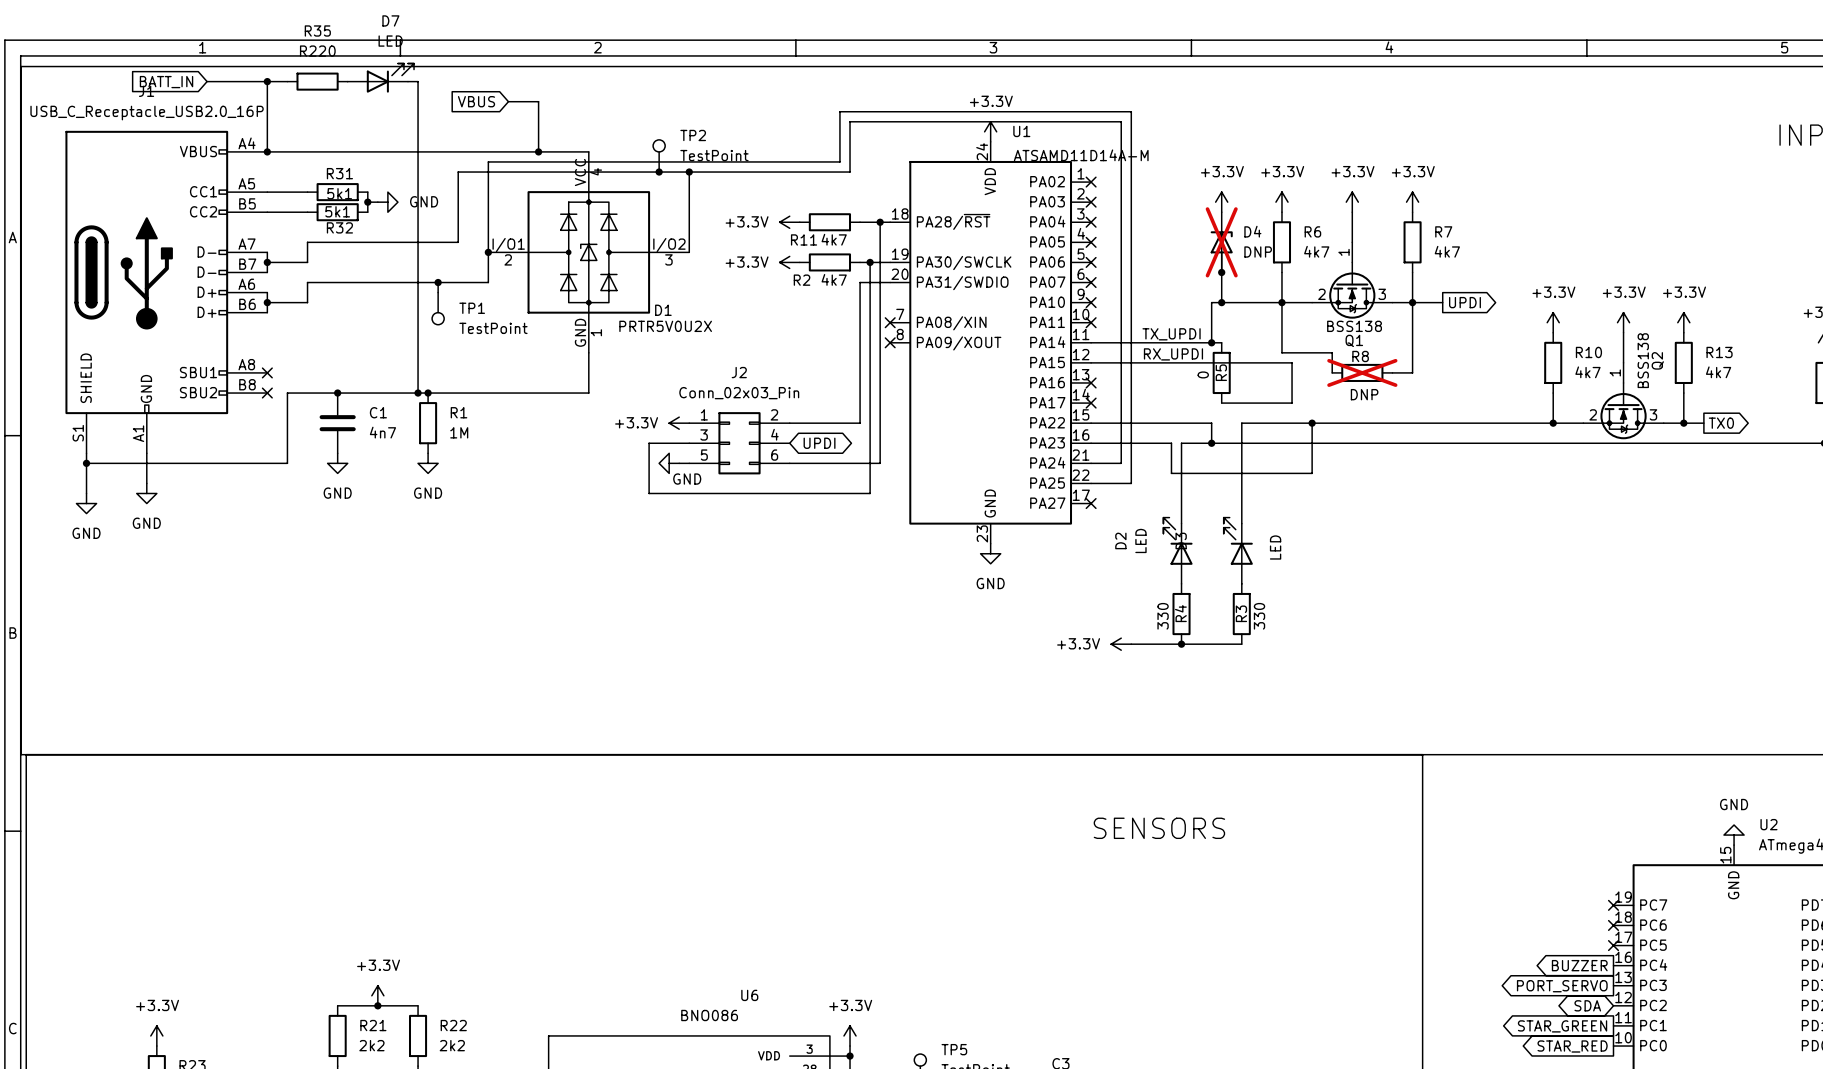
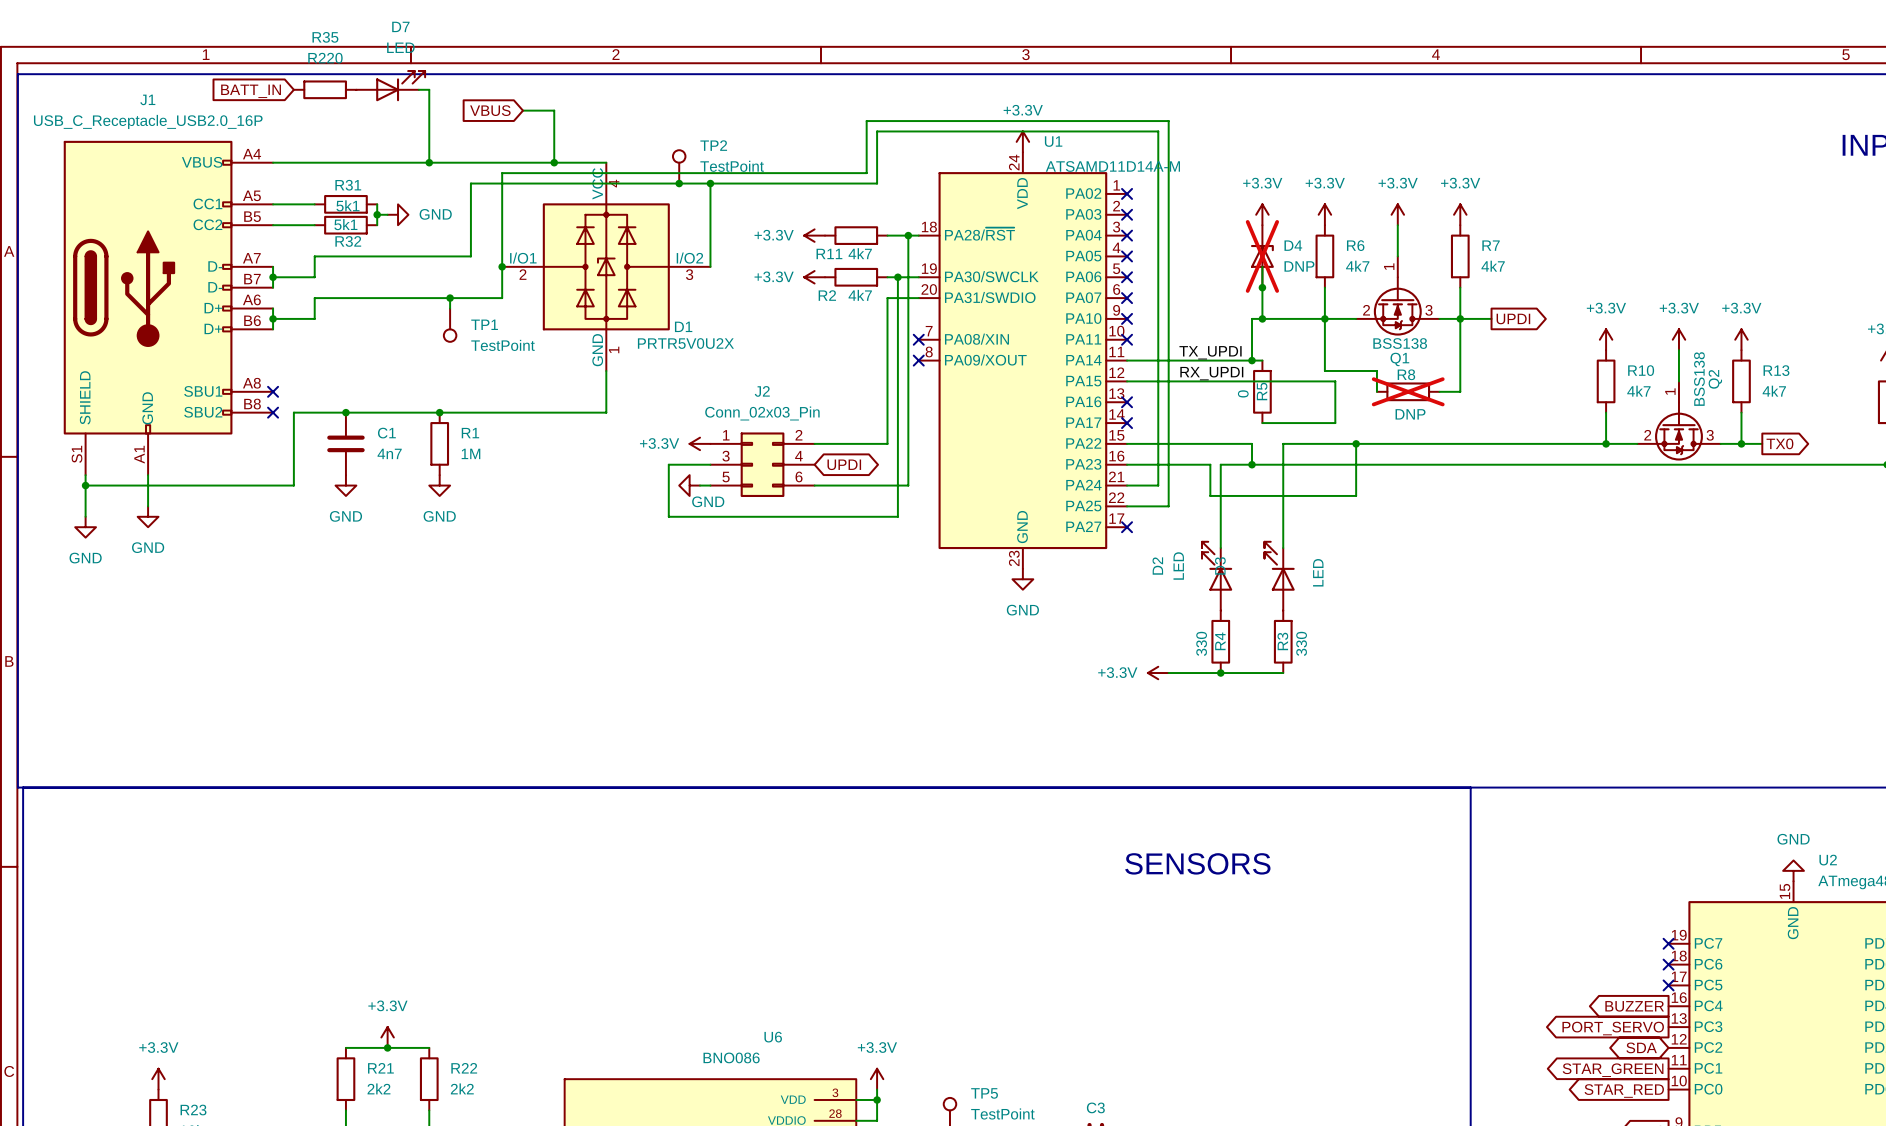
wire: (207, 81) (287, 81) -> none
wire: (267, 81) (267, 151) -> none
junction: (267, 81) -> none
global label position: BATT_IN (166, 82) -> BATT_IN (251, 91)
junction: (267, 151) -> none
wire: (418, 151) (418, 393) -> none
junction: none -> (429, 162)
junction: (418, 393) -> none

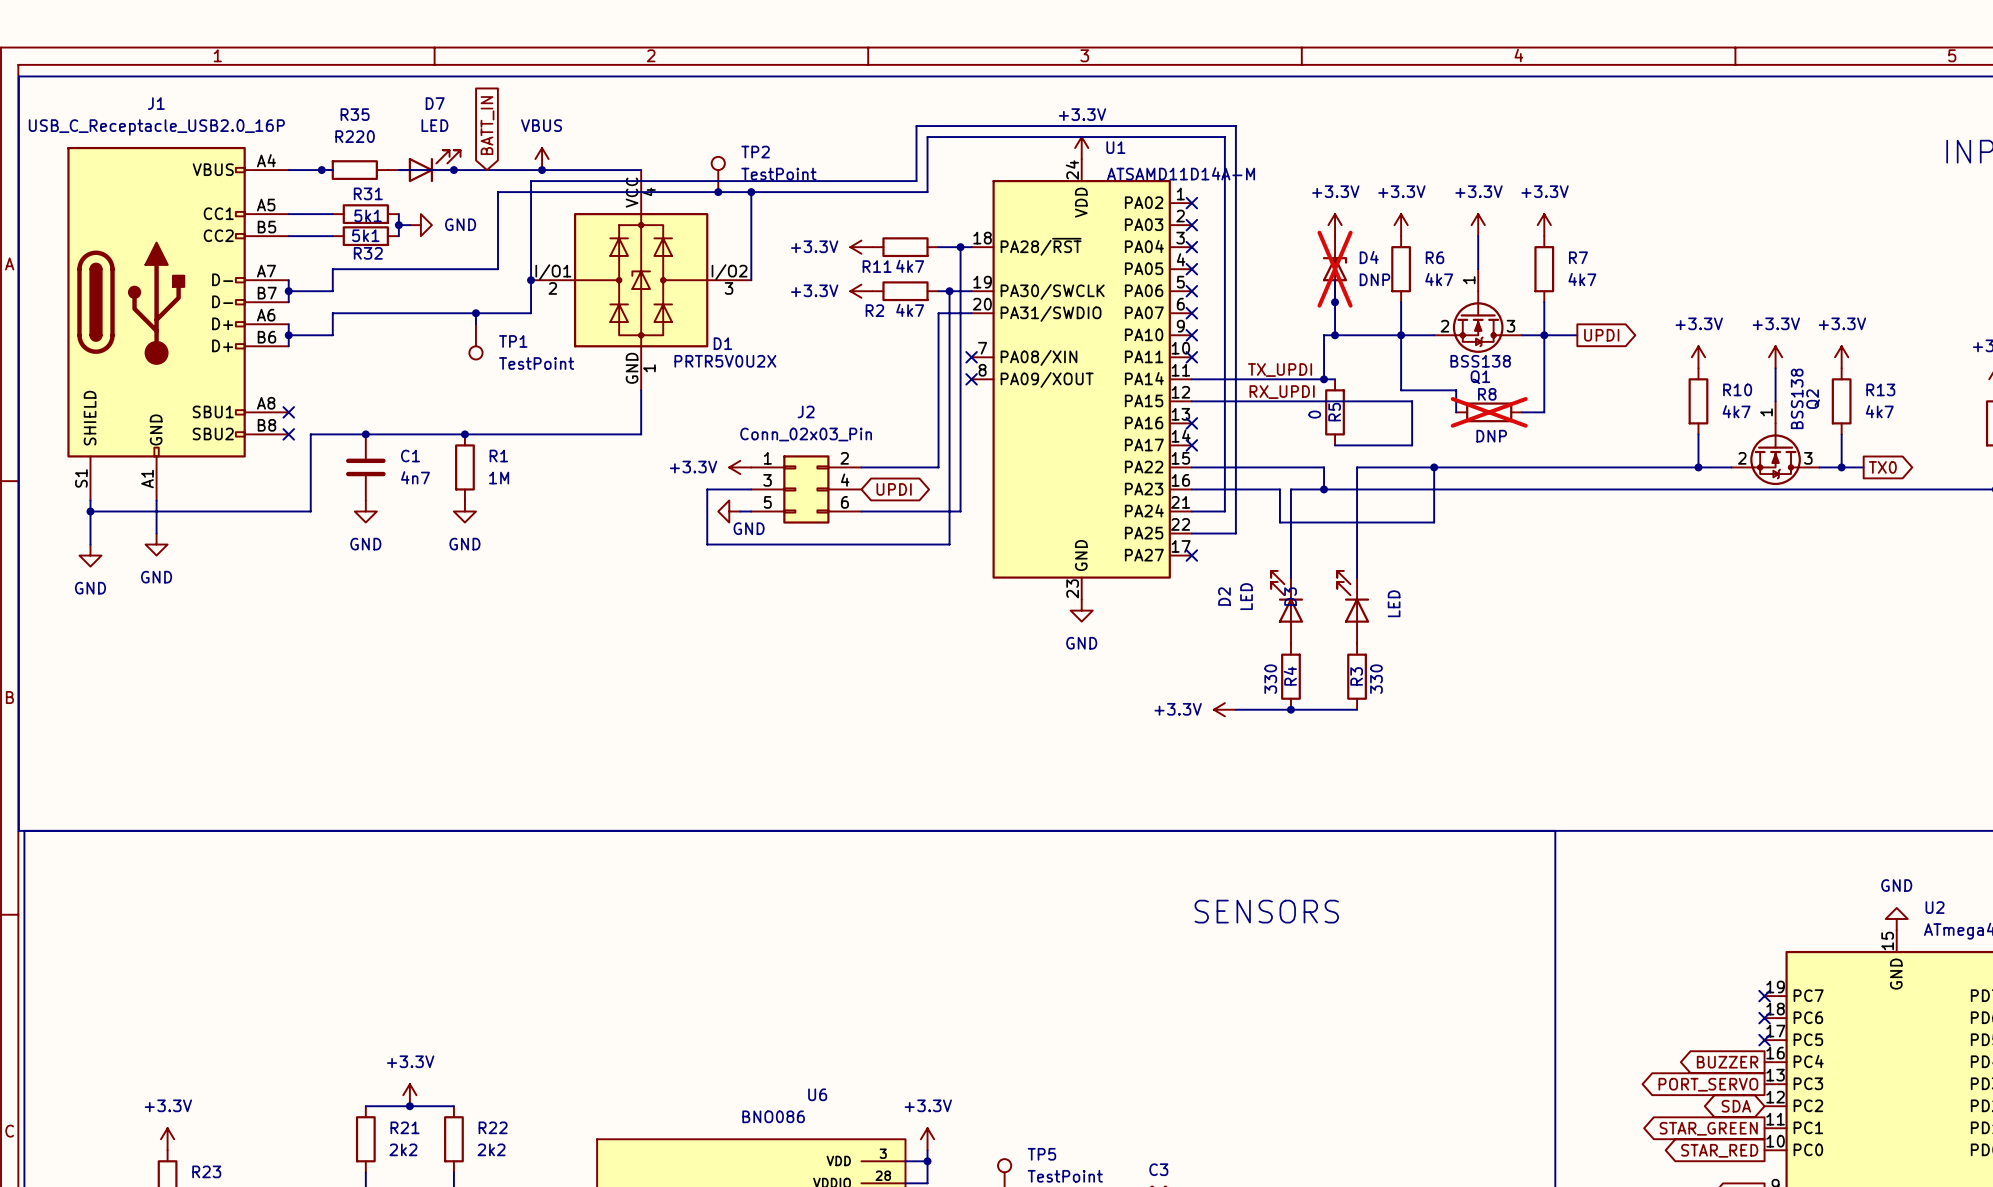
D7 position: (390, 86) -> (424, 166)
R35 position: (325, 89) -> (354, 170)
wire: (418, 89) (429, 89) (429, 162) -> none
global label rotation: 0° (251, 91) -> 90° clockwise (487, 125)
global label position: BATT_IN (251, 91) -> BATT_IN (487, 125)
global label: VBUS (490, 110) -> none
wire: (523, 110) (554, 110) (554, 162) -> none
power symbol: none -> VBUS (542, 159)
junction: none -> (321, 170)
wire: (314, 162) (377, 162) -> none
junction position: (554, 162) -> (542, 170)

